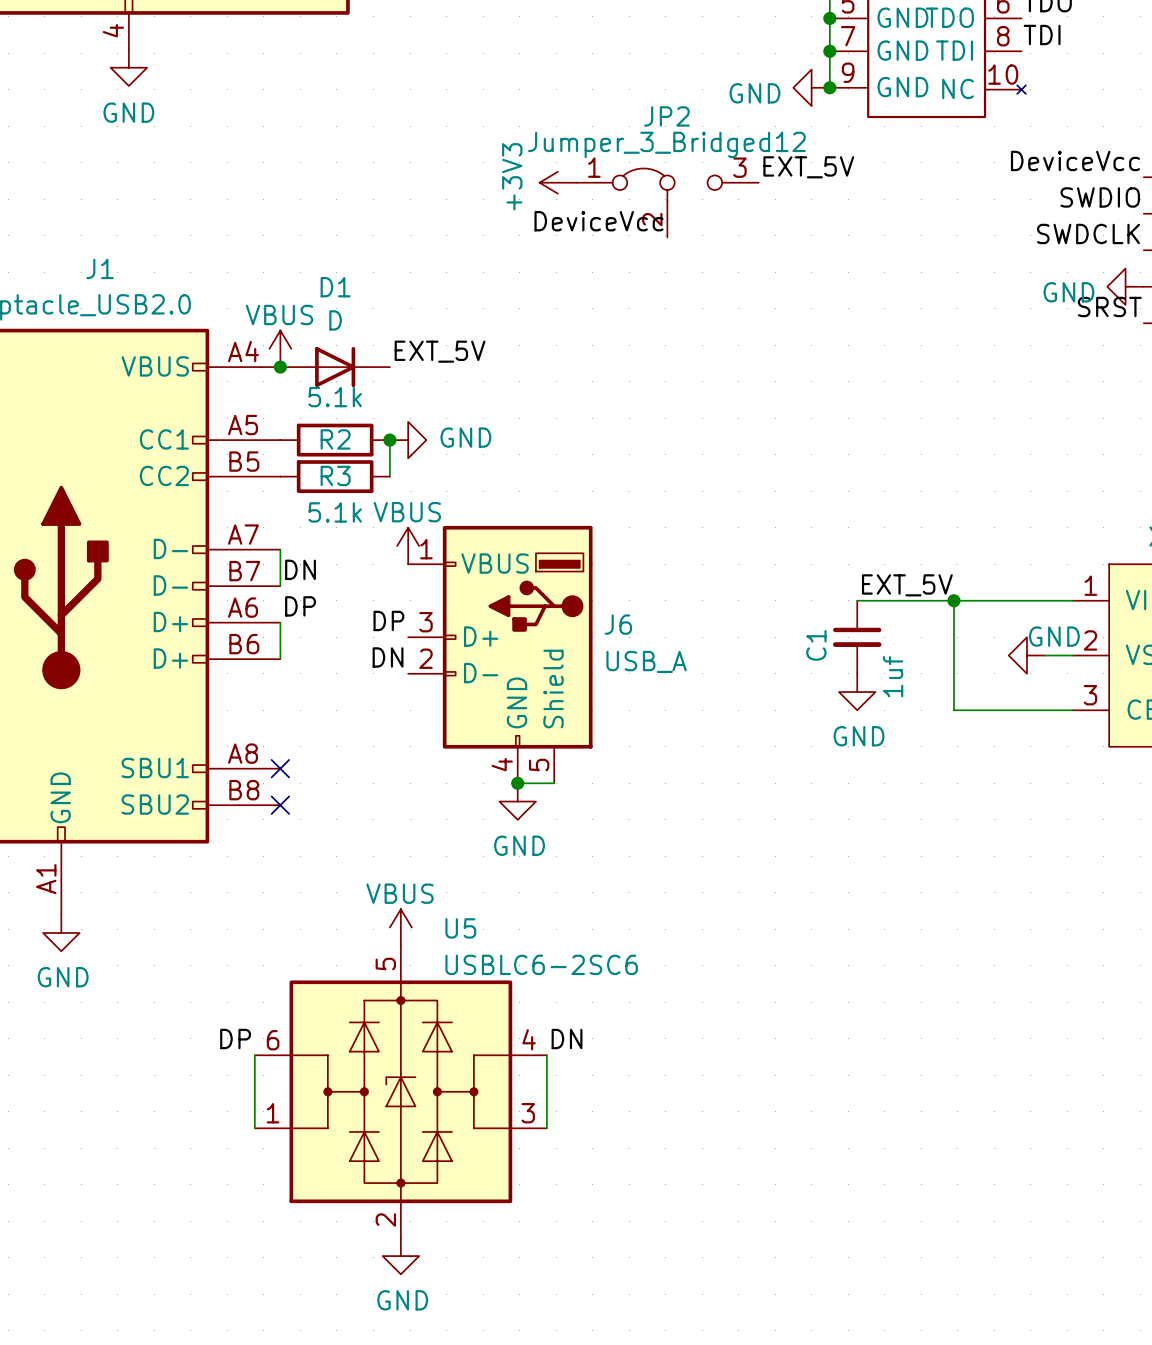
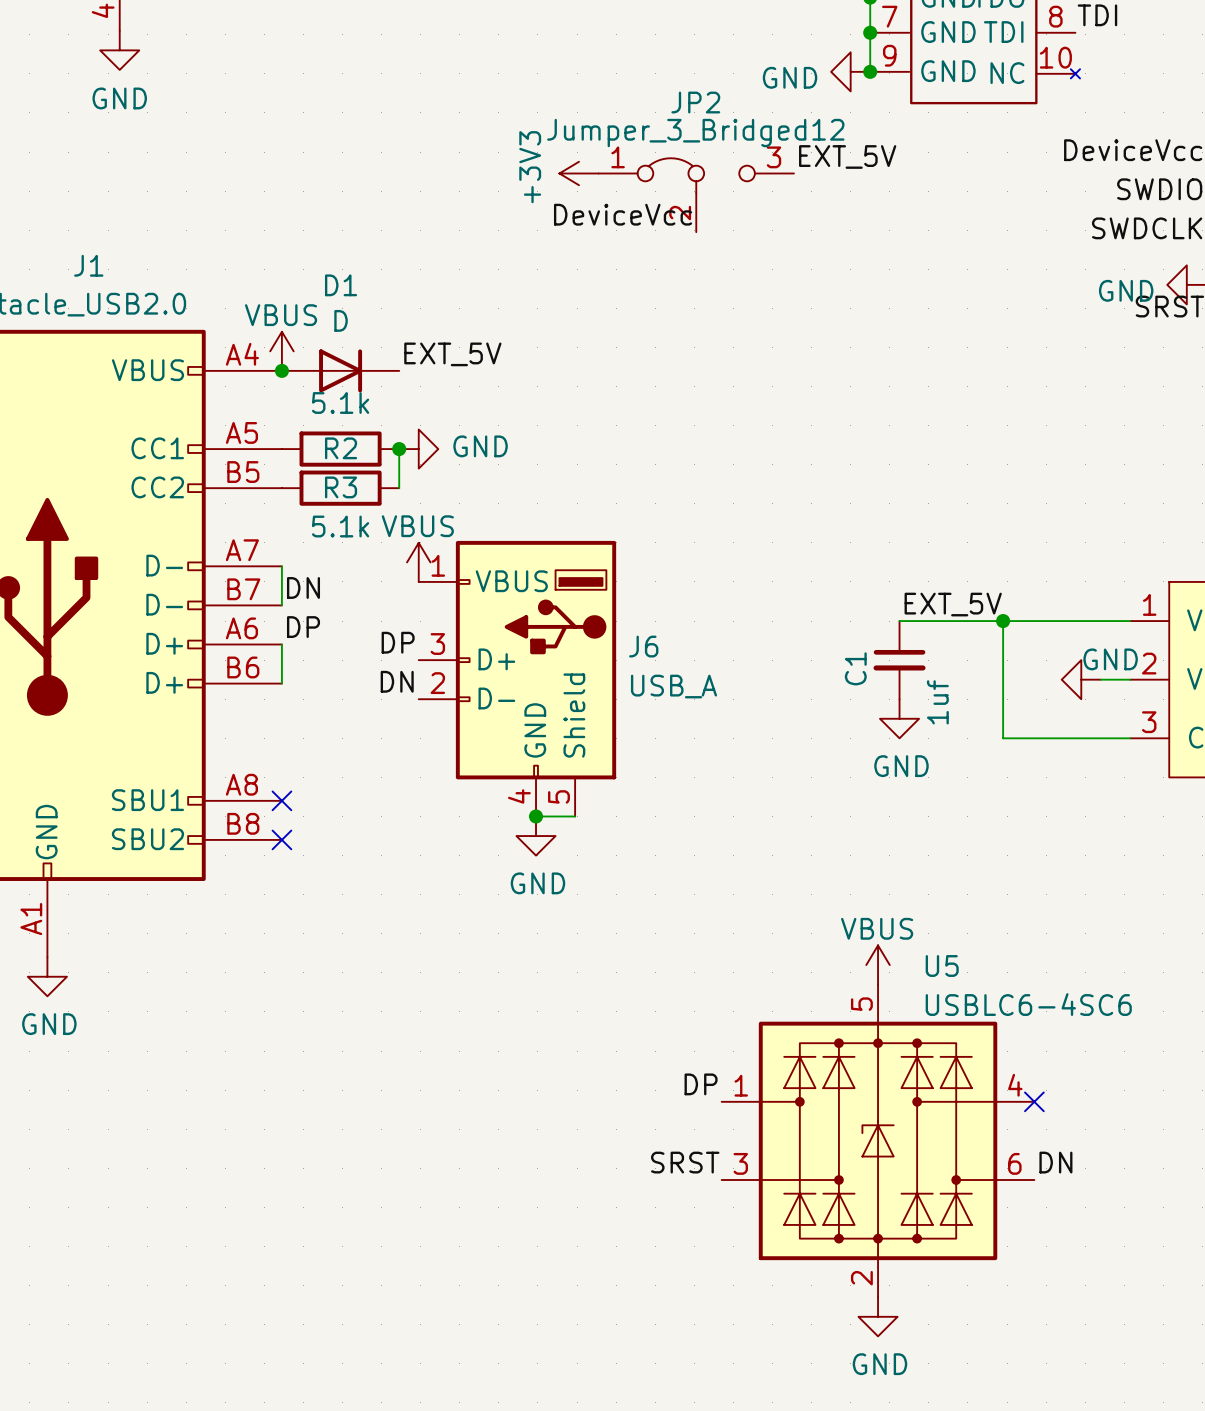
power symbol: none -> VBUS (878, 965)
power symbol: VBUS (400, 927) -> none
U5 symbol: [254, 945, 547, 1238] -> [721, 984, 1035, 1298]
U5 value: USBLC6-2SC6 (541, 964) -> USBLC6-4SC6 (1028, 1004)
label: none -> DP (701, 1084)
label: DP (235, 1039) -> none
label: DN (567, 1039) -> none
no-connect mark: none -> (1034, 1101)
wire: (254, 1055) (254, 1128) -> none
wire: (546, 1055) (546, 1128) -> none
label: none -> SRST (685, 1162)
label: none -> DN (1055, 1162)
power symbol: none -> GND (878, 1316)
power symbol: GND (400, 1256) -> none

